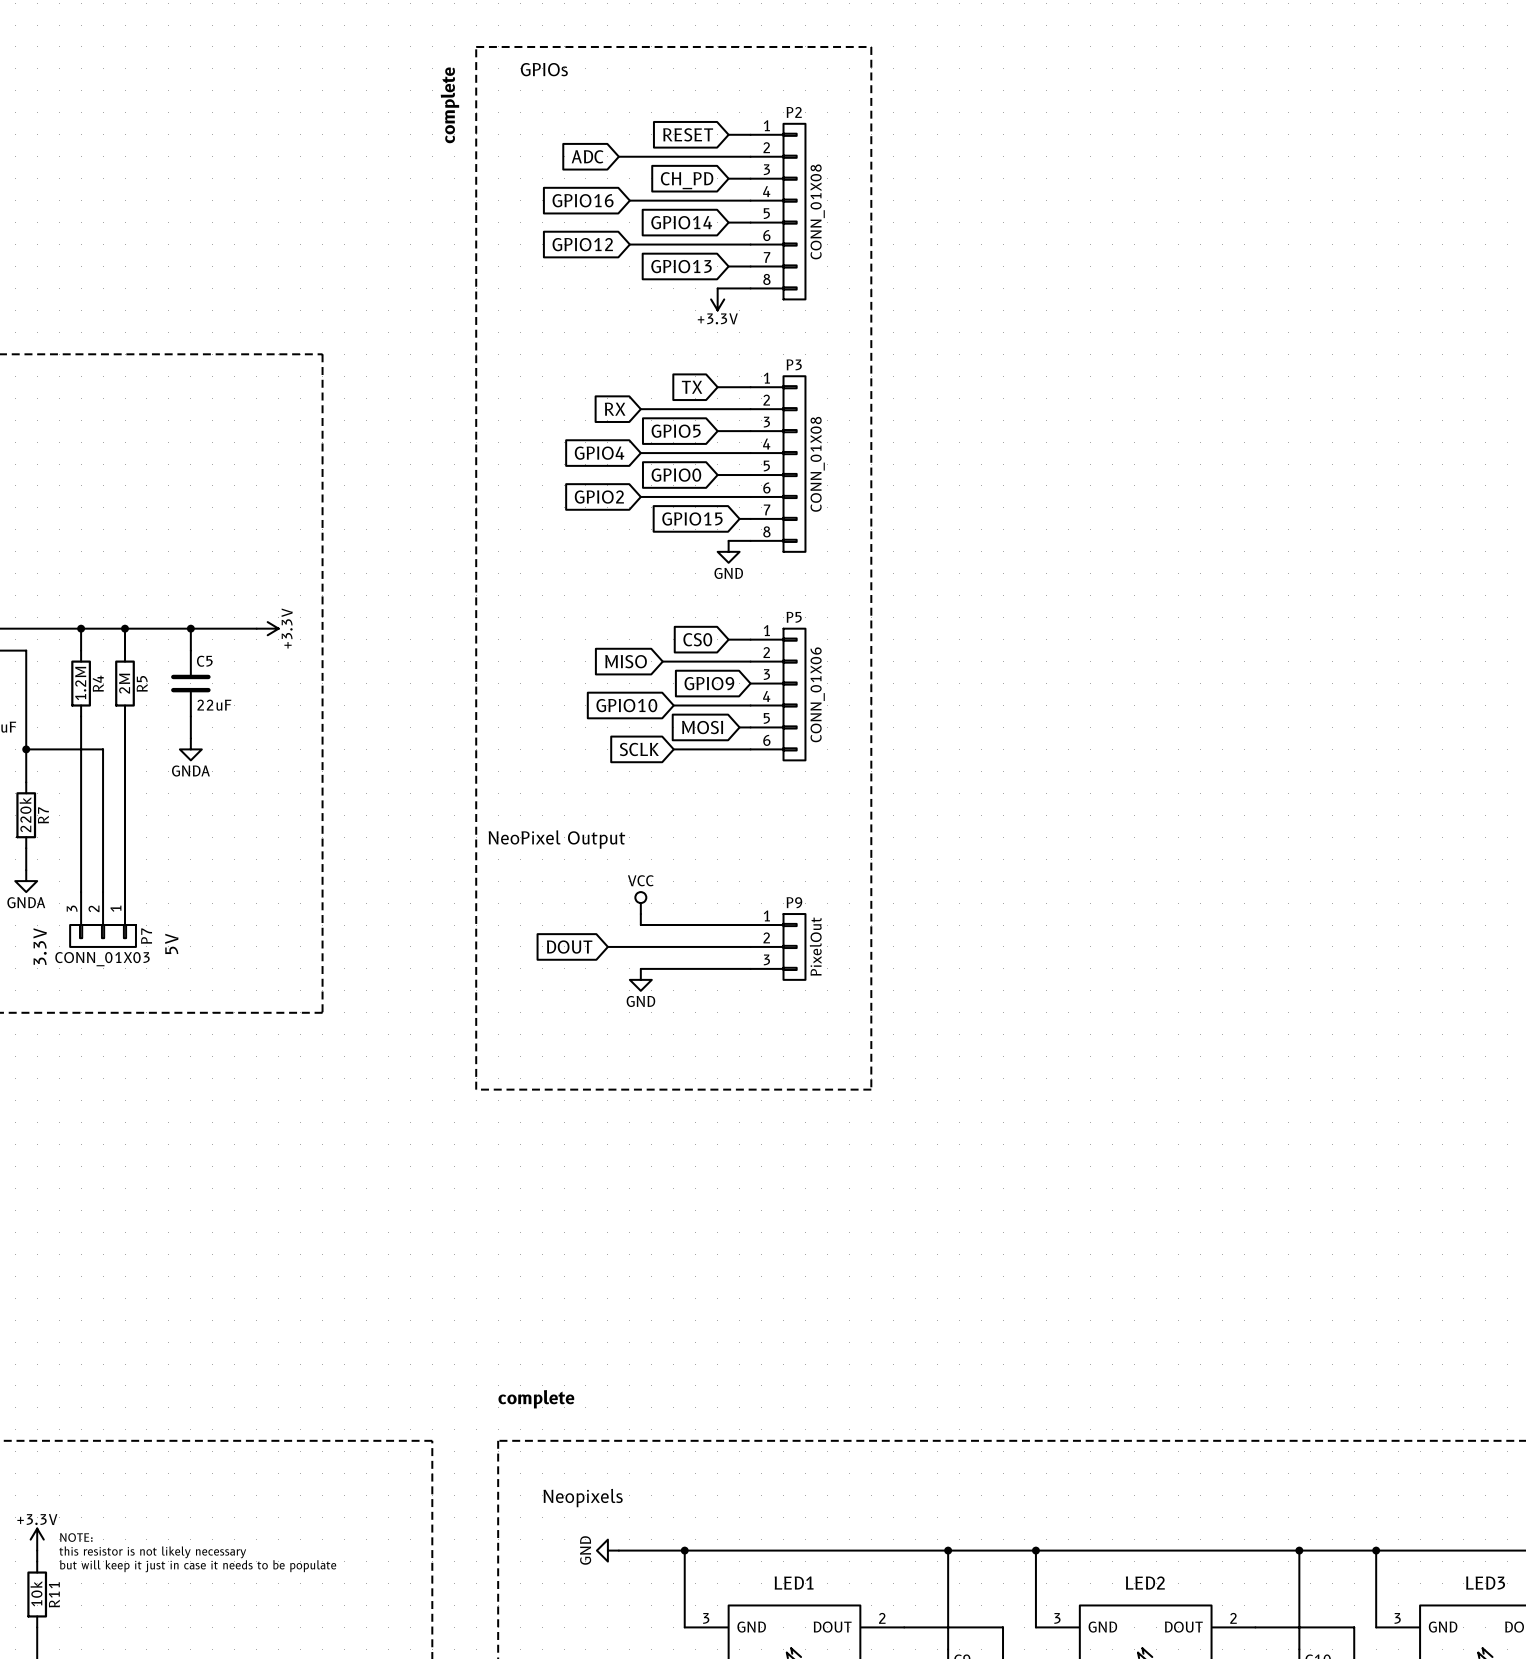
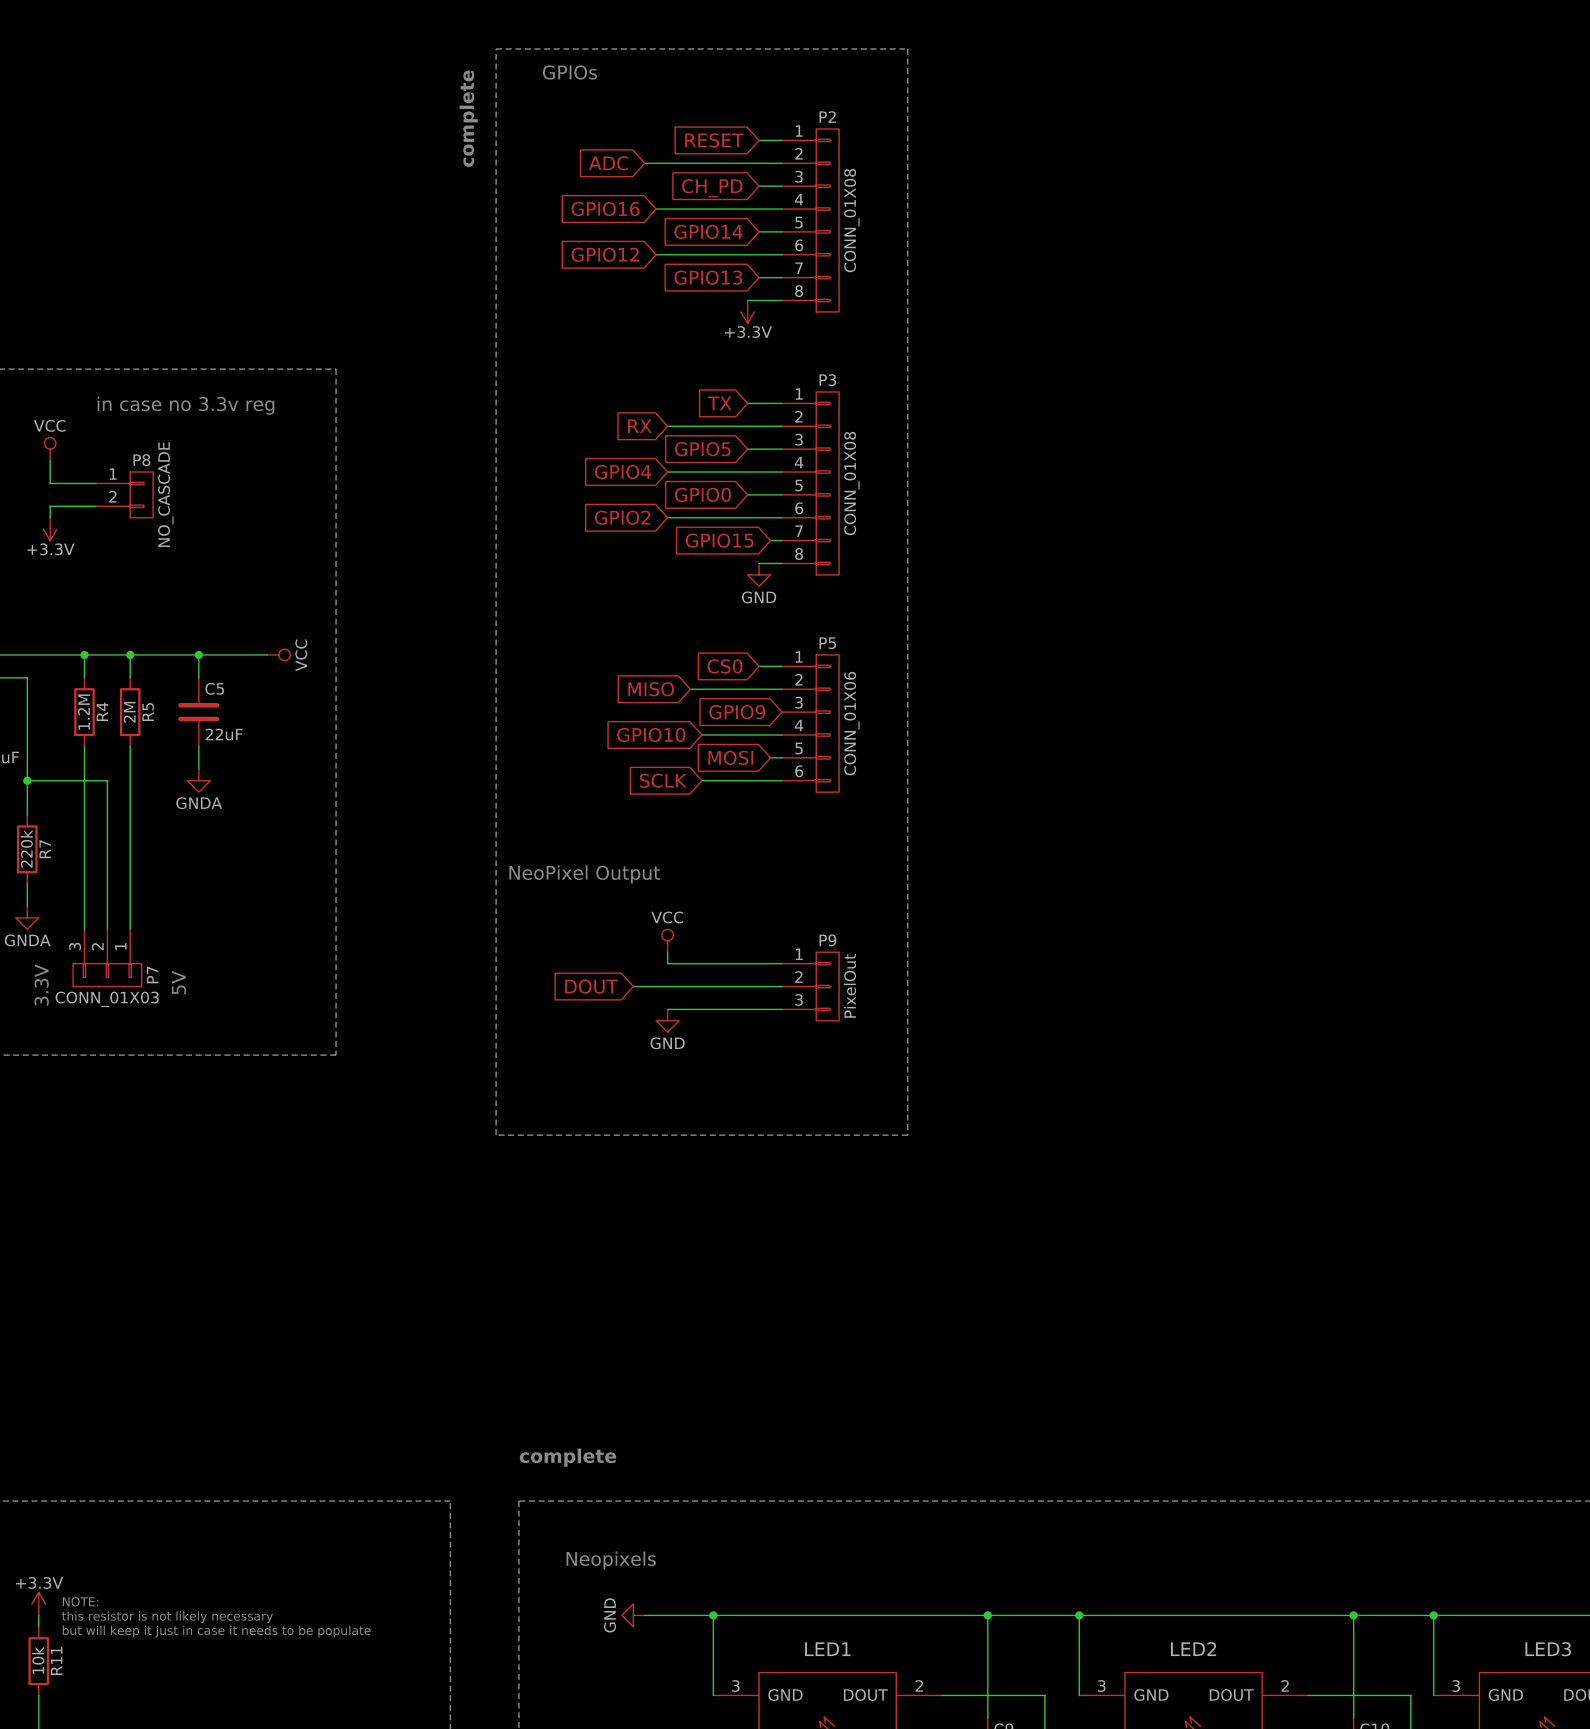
text: none -> in case no 3.3v reg (186, 405)
power symbol: none -> VCC (50, 449)
wire: none -> (50, 460) (50, 483) (95, 483)
P8: none -> NO_CASCADE (124, 494)
wire: none -> (95, 506) (50, 506) (50, 517)
power symbol: none -> +3.3V (50, 529)
power symbol: +3.3V (267, 628) -> VCC (278, 654)

